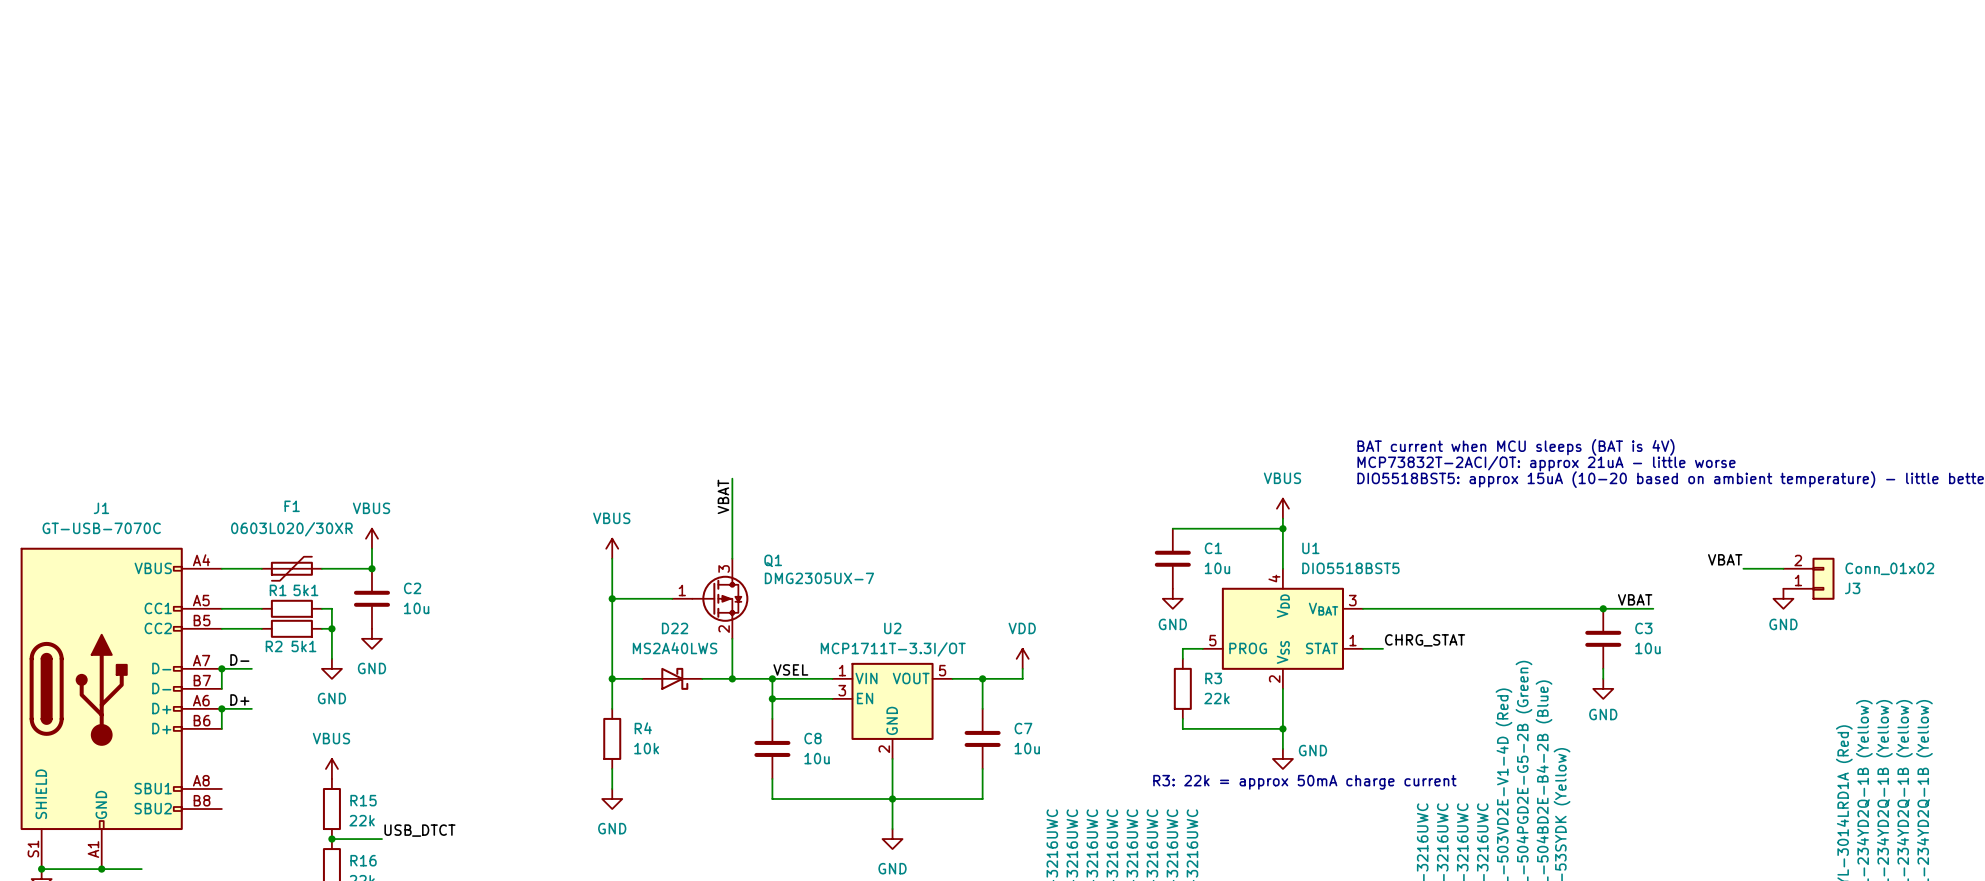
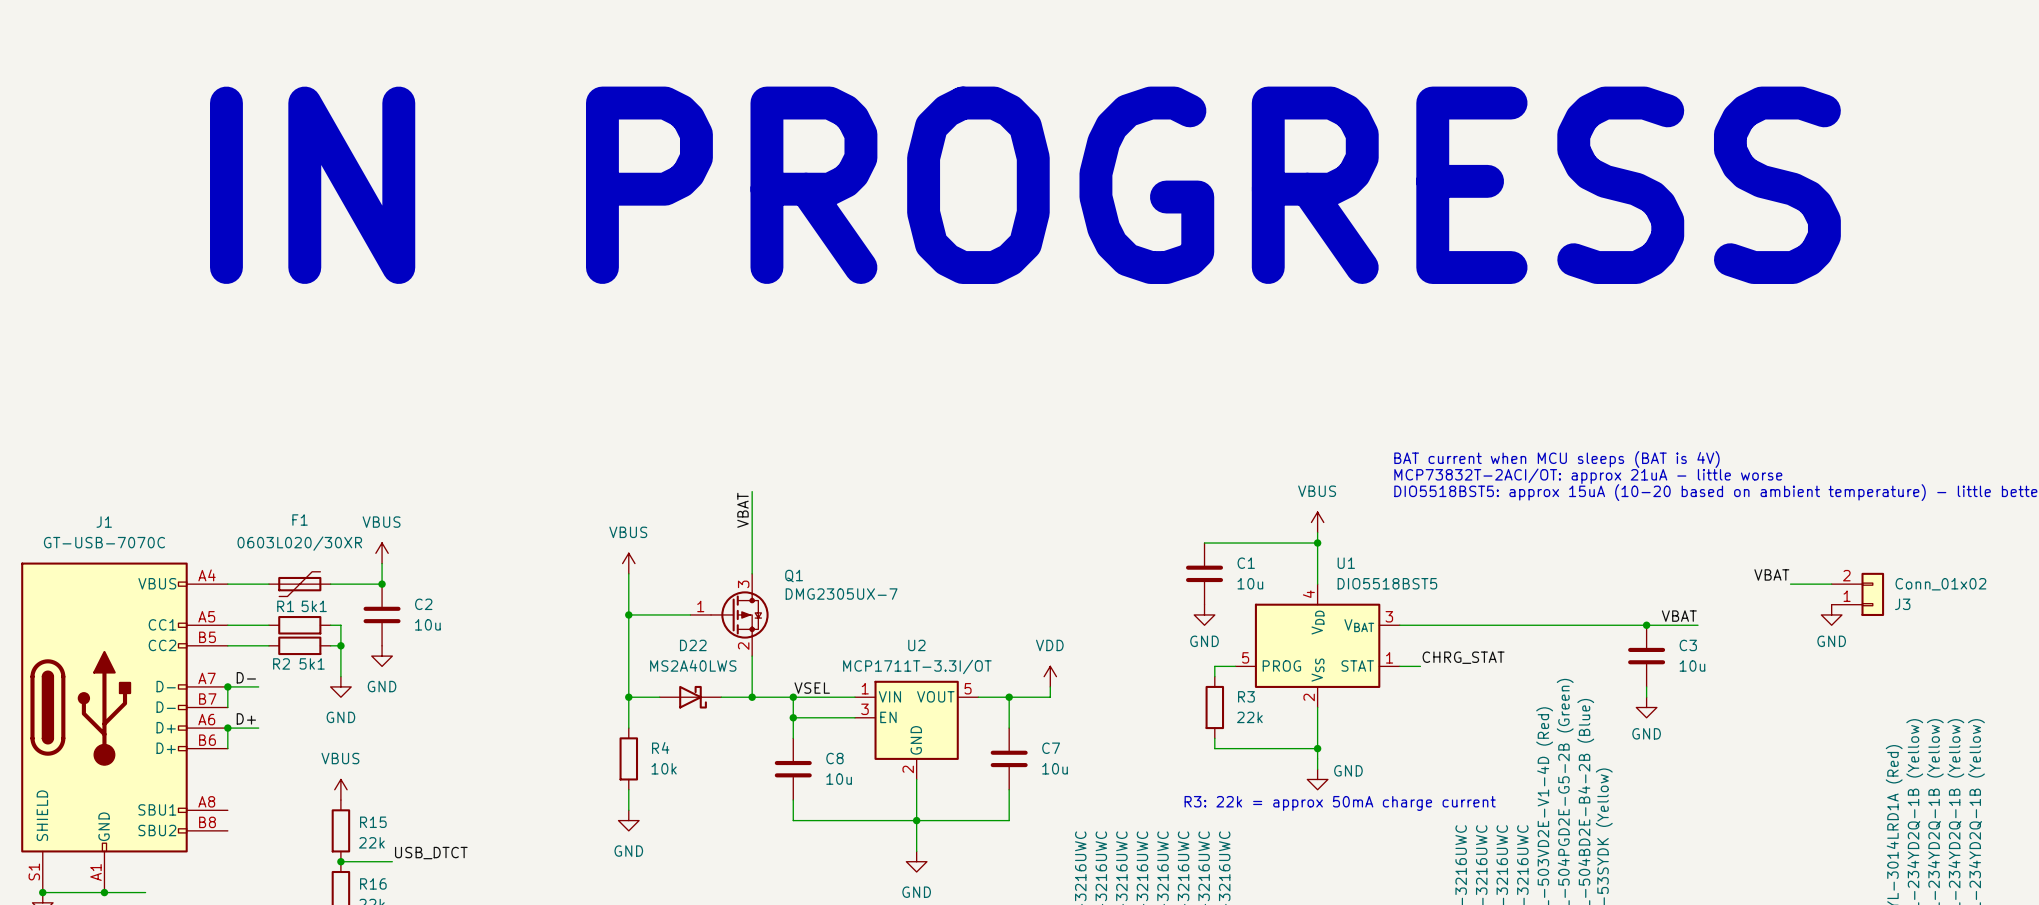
text: none -> IN PROGRESS (1025, 185)

